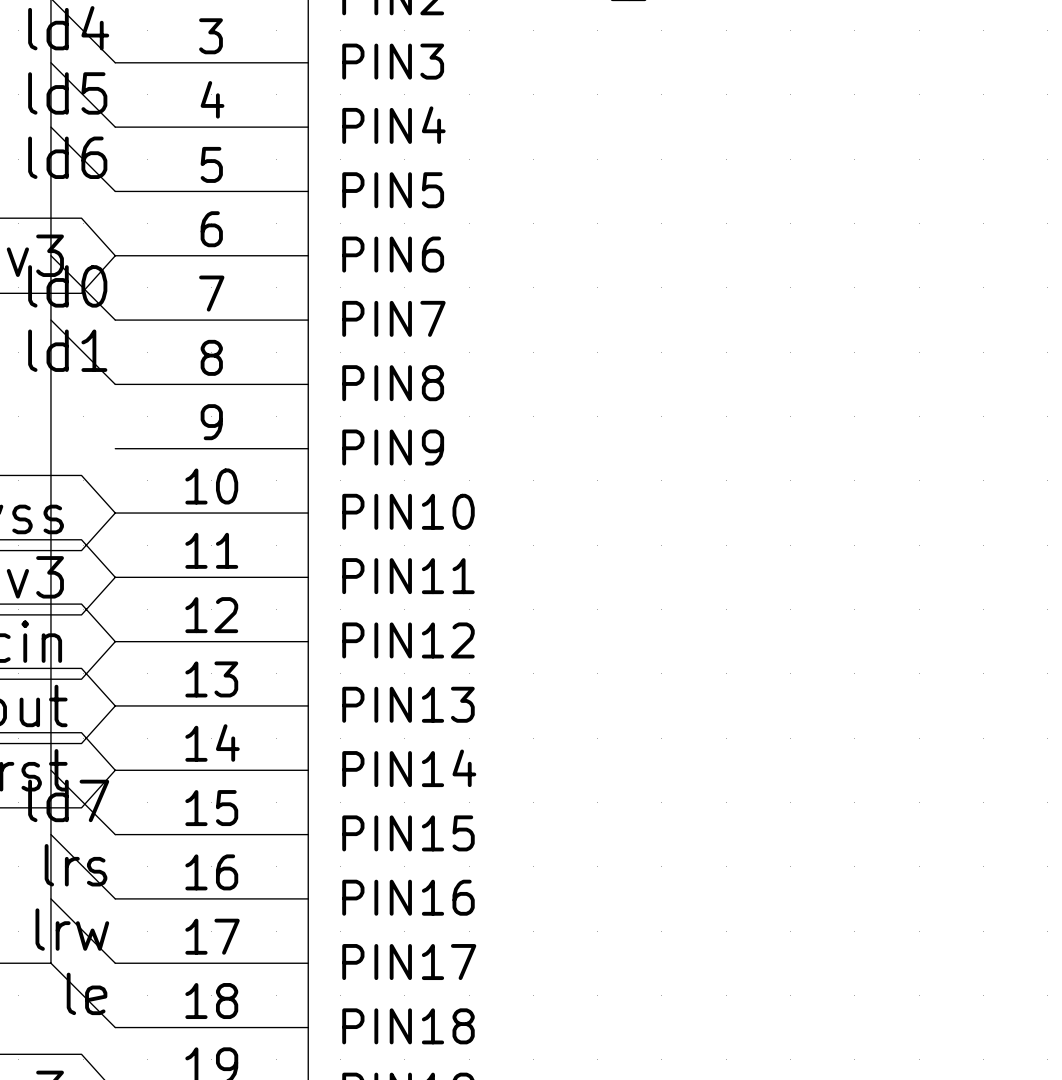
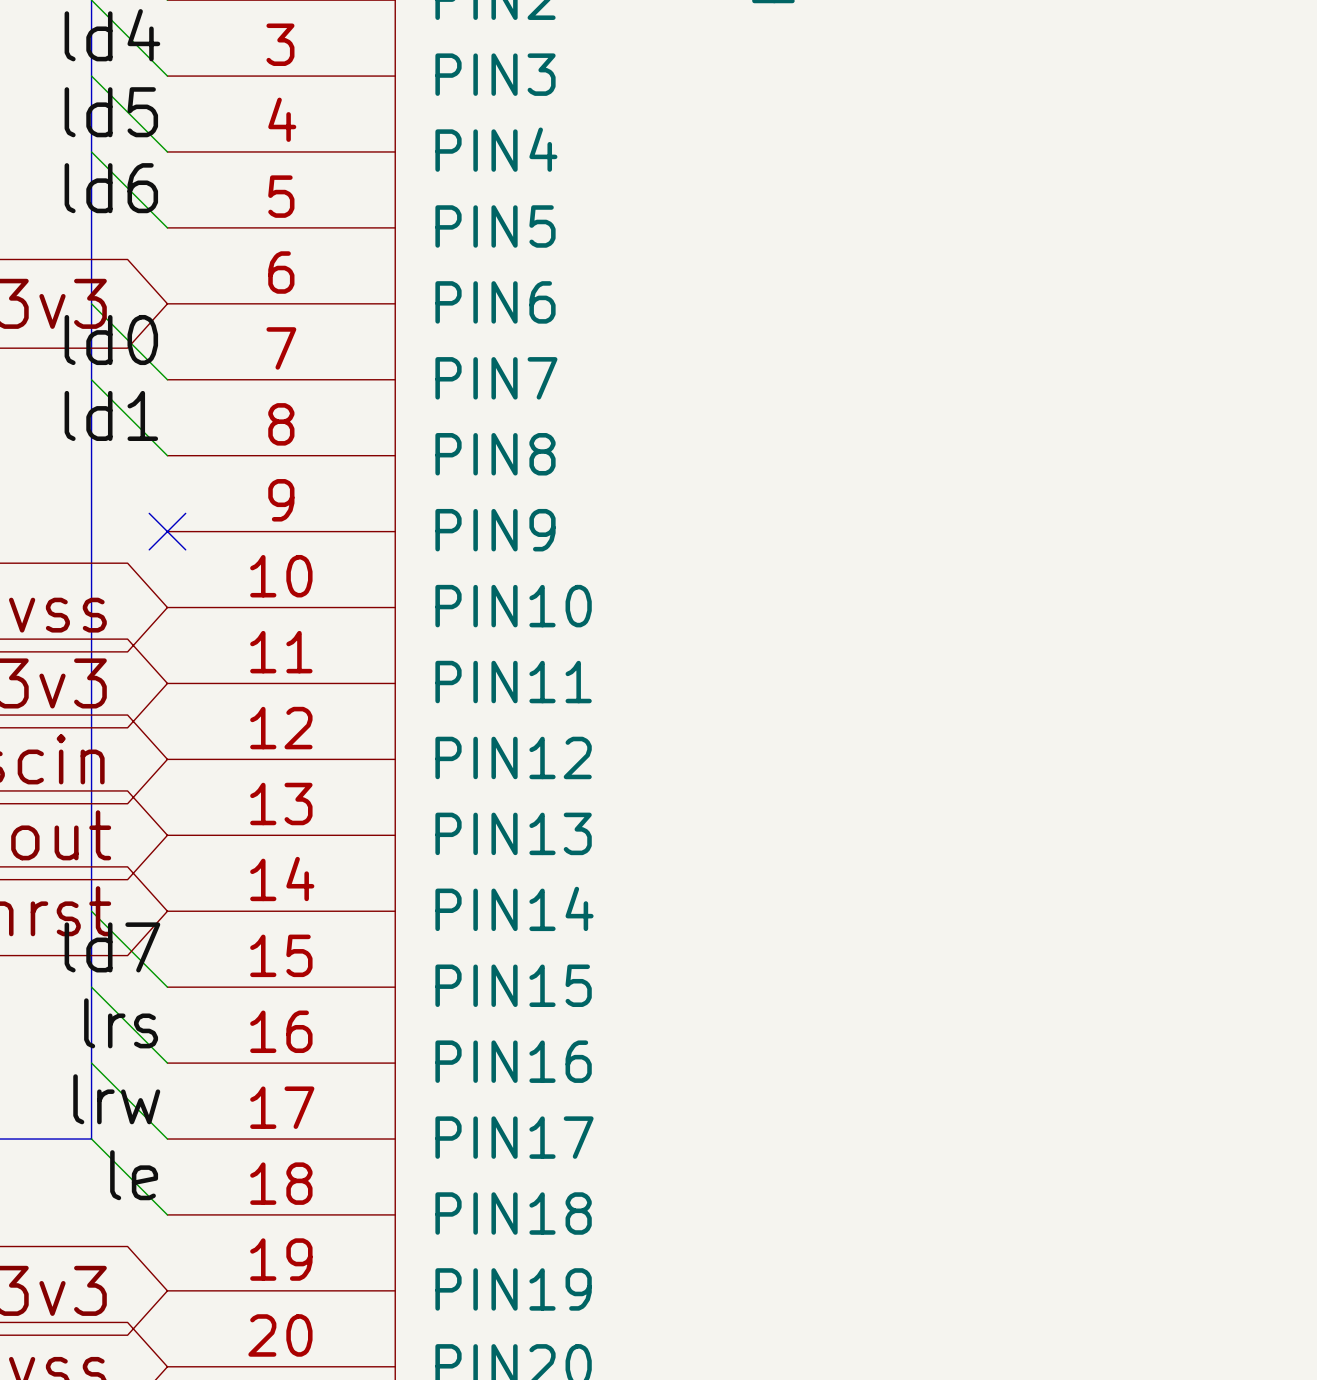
no-connect mark: none -> (167, 531)

